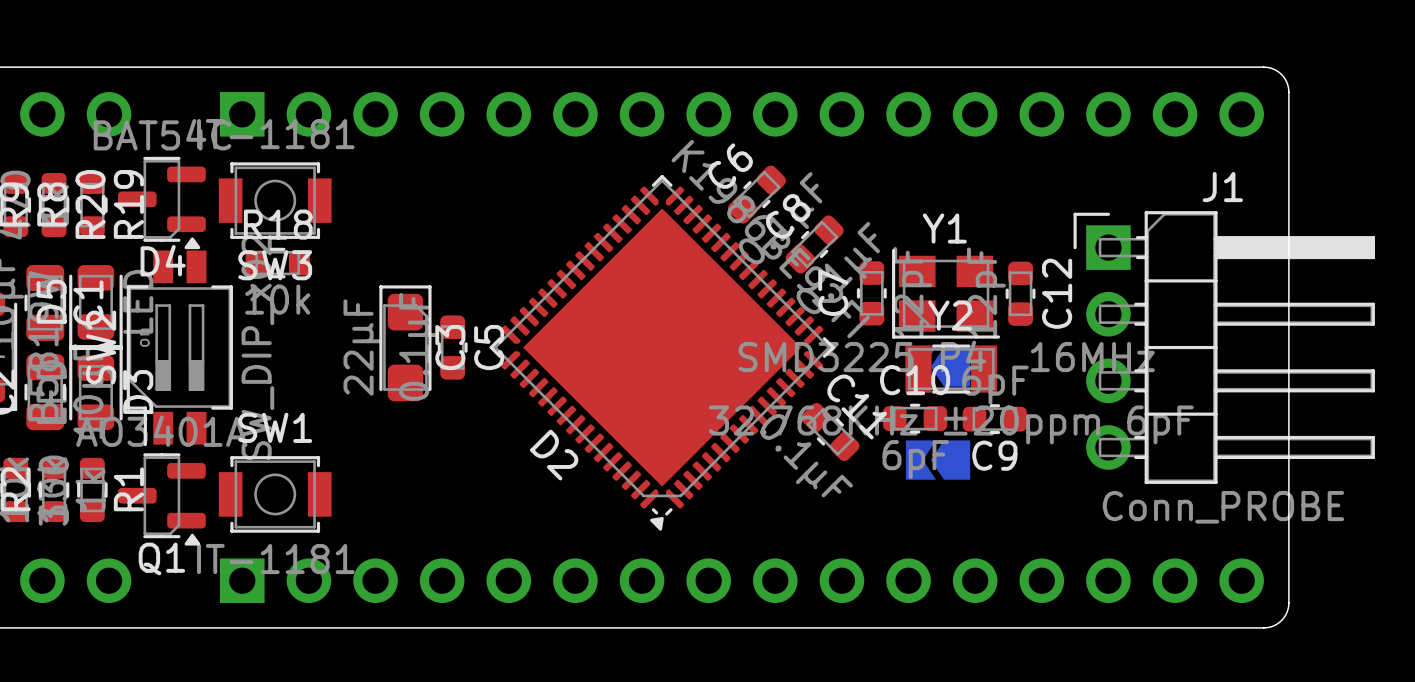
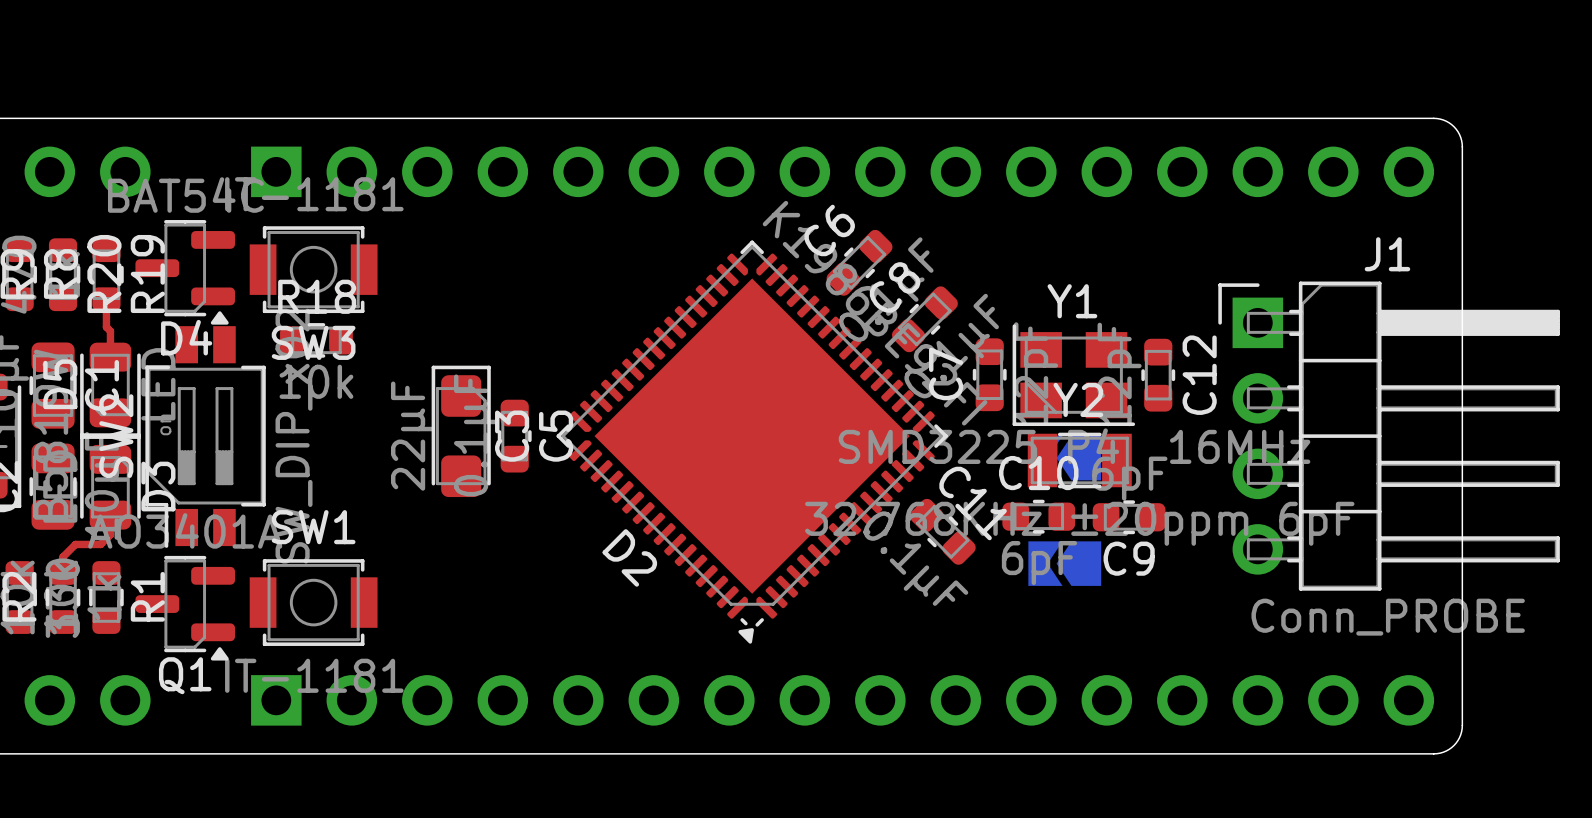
top track: none -> (106, 299) (106, 327) (110, 331) (110, 357)
top track: none -> (110, 515) (110, 534) (100, 544) (75, 544) (63, 556) (63, 572)

